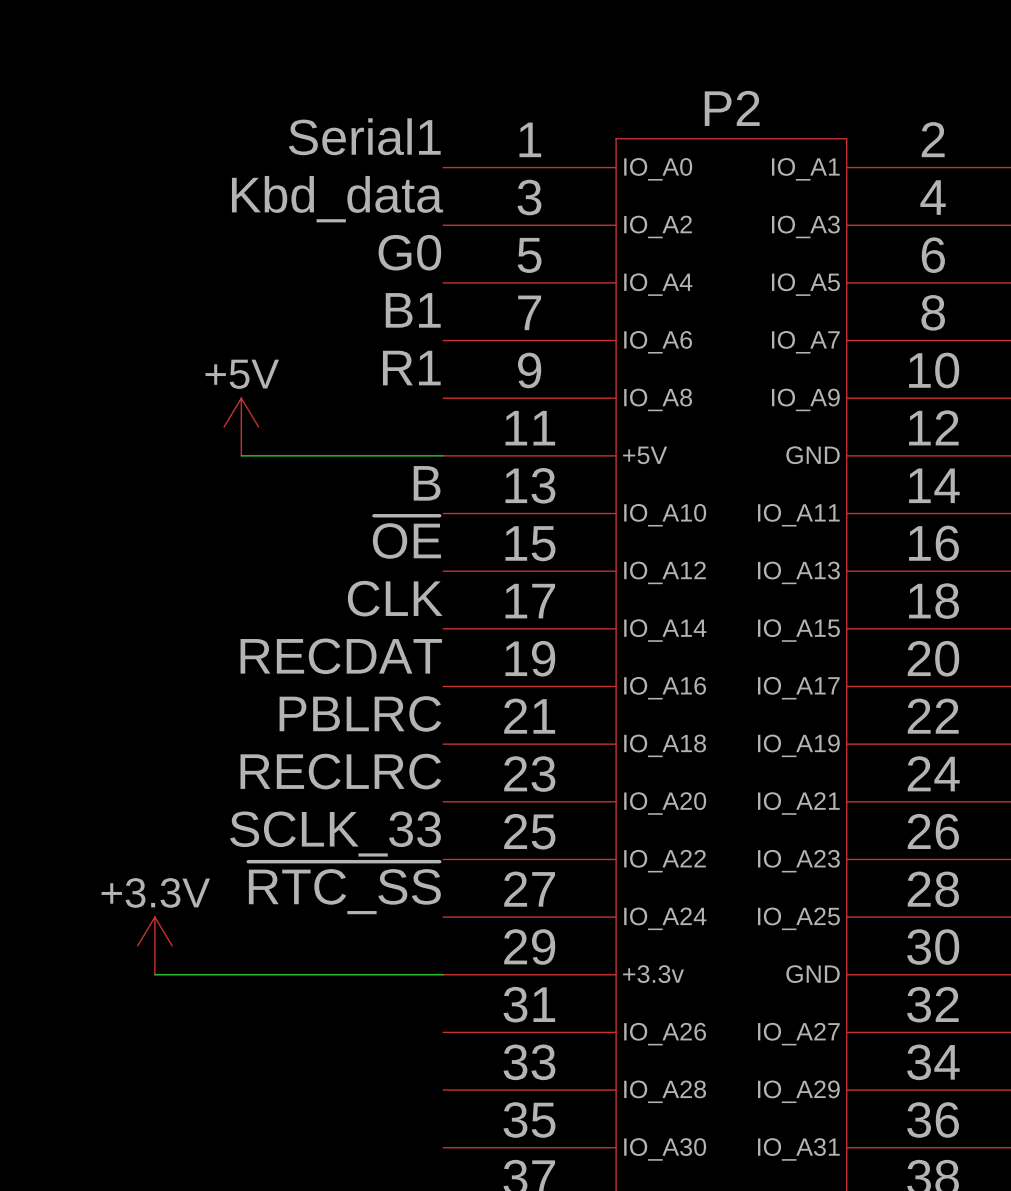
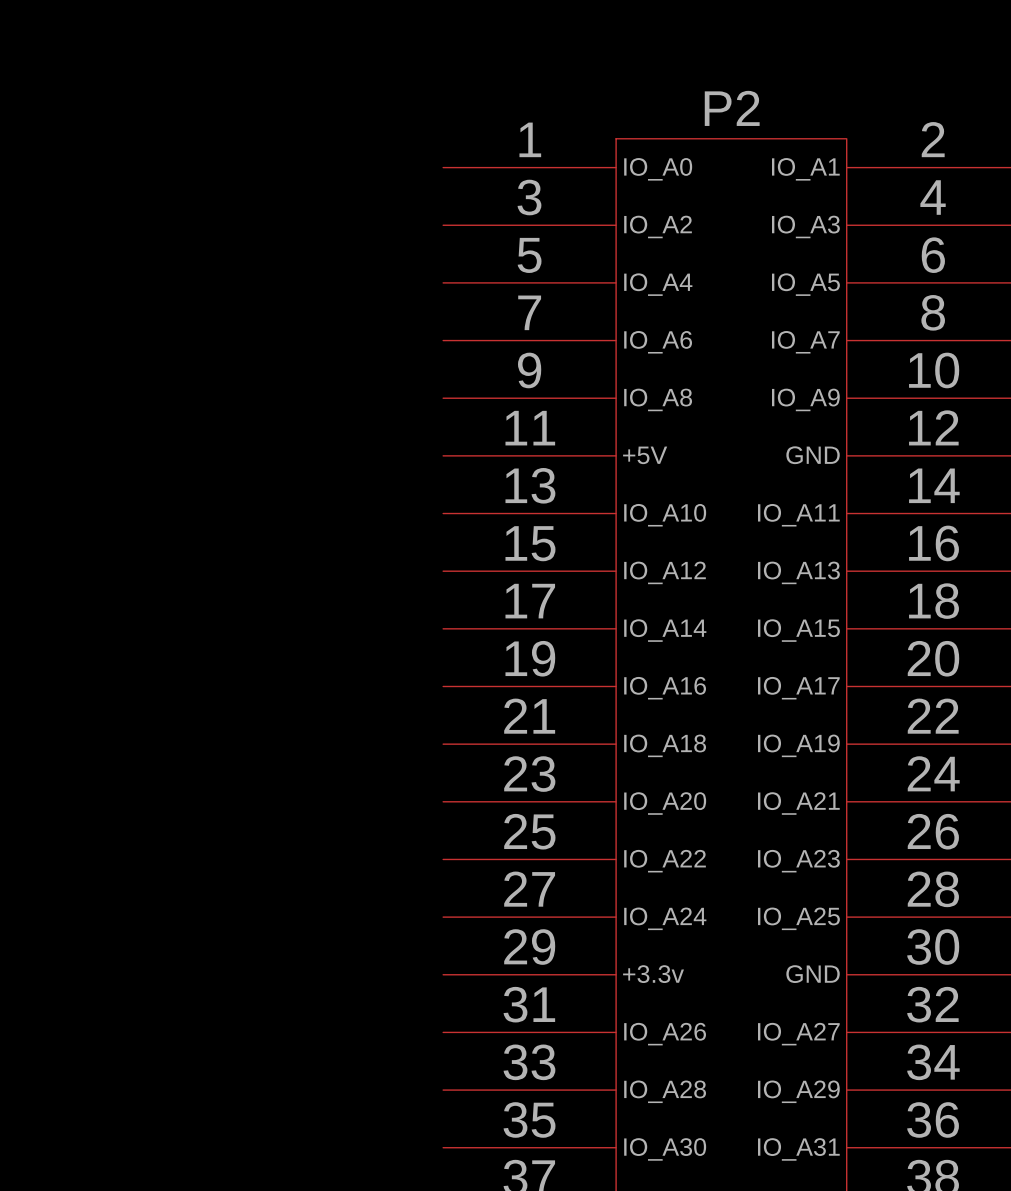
label: Serial1 (364, 136) -> none
label: Kbd_data (337, 199) -> none
label: G0 (409, 252) -> none
label: B1 (413, 310) -> none
label: R1 (411, 368) -> none
power symbol: +5V (241, 427) -> none
wire: (241, 455) (443, 455) -> none
label: B (427, 483) -> none
label: ~{OE} (406, 537) -> none
label: CLK (395, 598) -> none
label: RECDAT (341, 656) -> none
label: PBLRC (360, 713) -> none
label: RECLRC (340, 771) -> none
label: SCLK_33 (335, 834) -> none
label: ~{RTC_SS} (344, 887) -> none
power symbol: +3.3V (154, 945) -> none
wire: (154, 974) (443, 974) -> none

